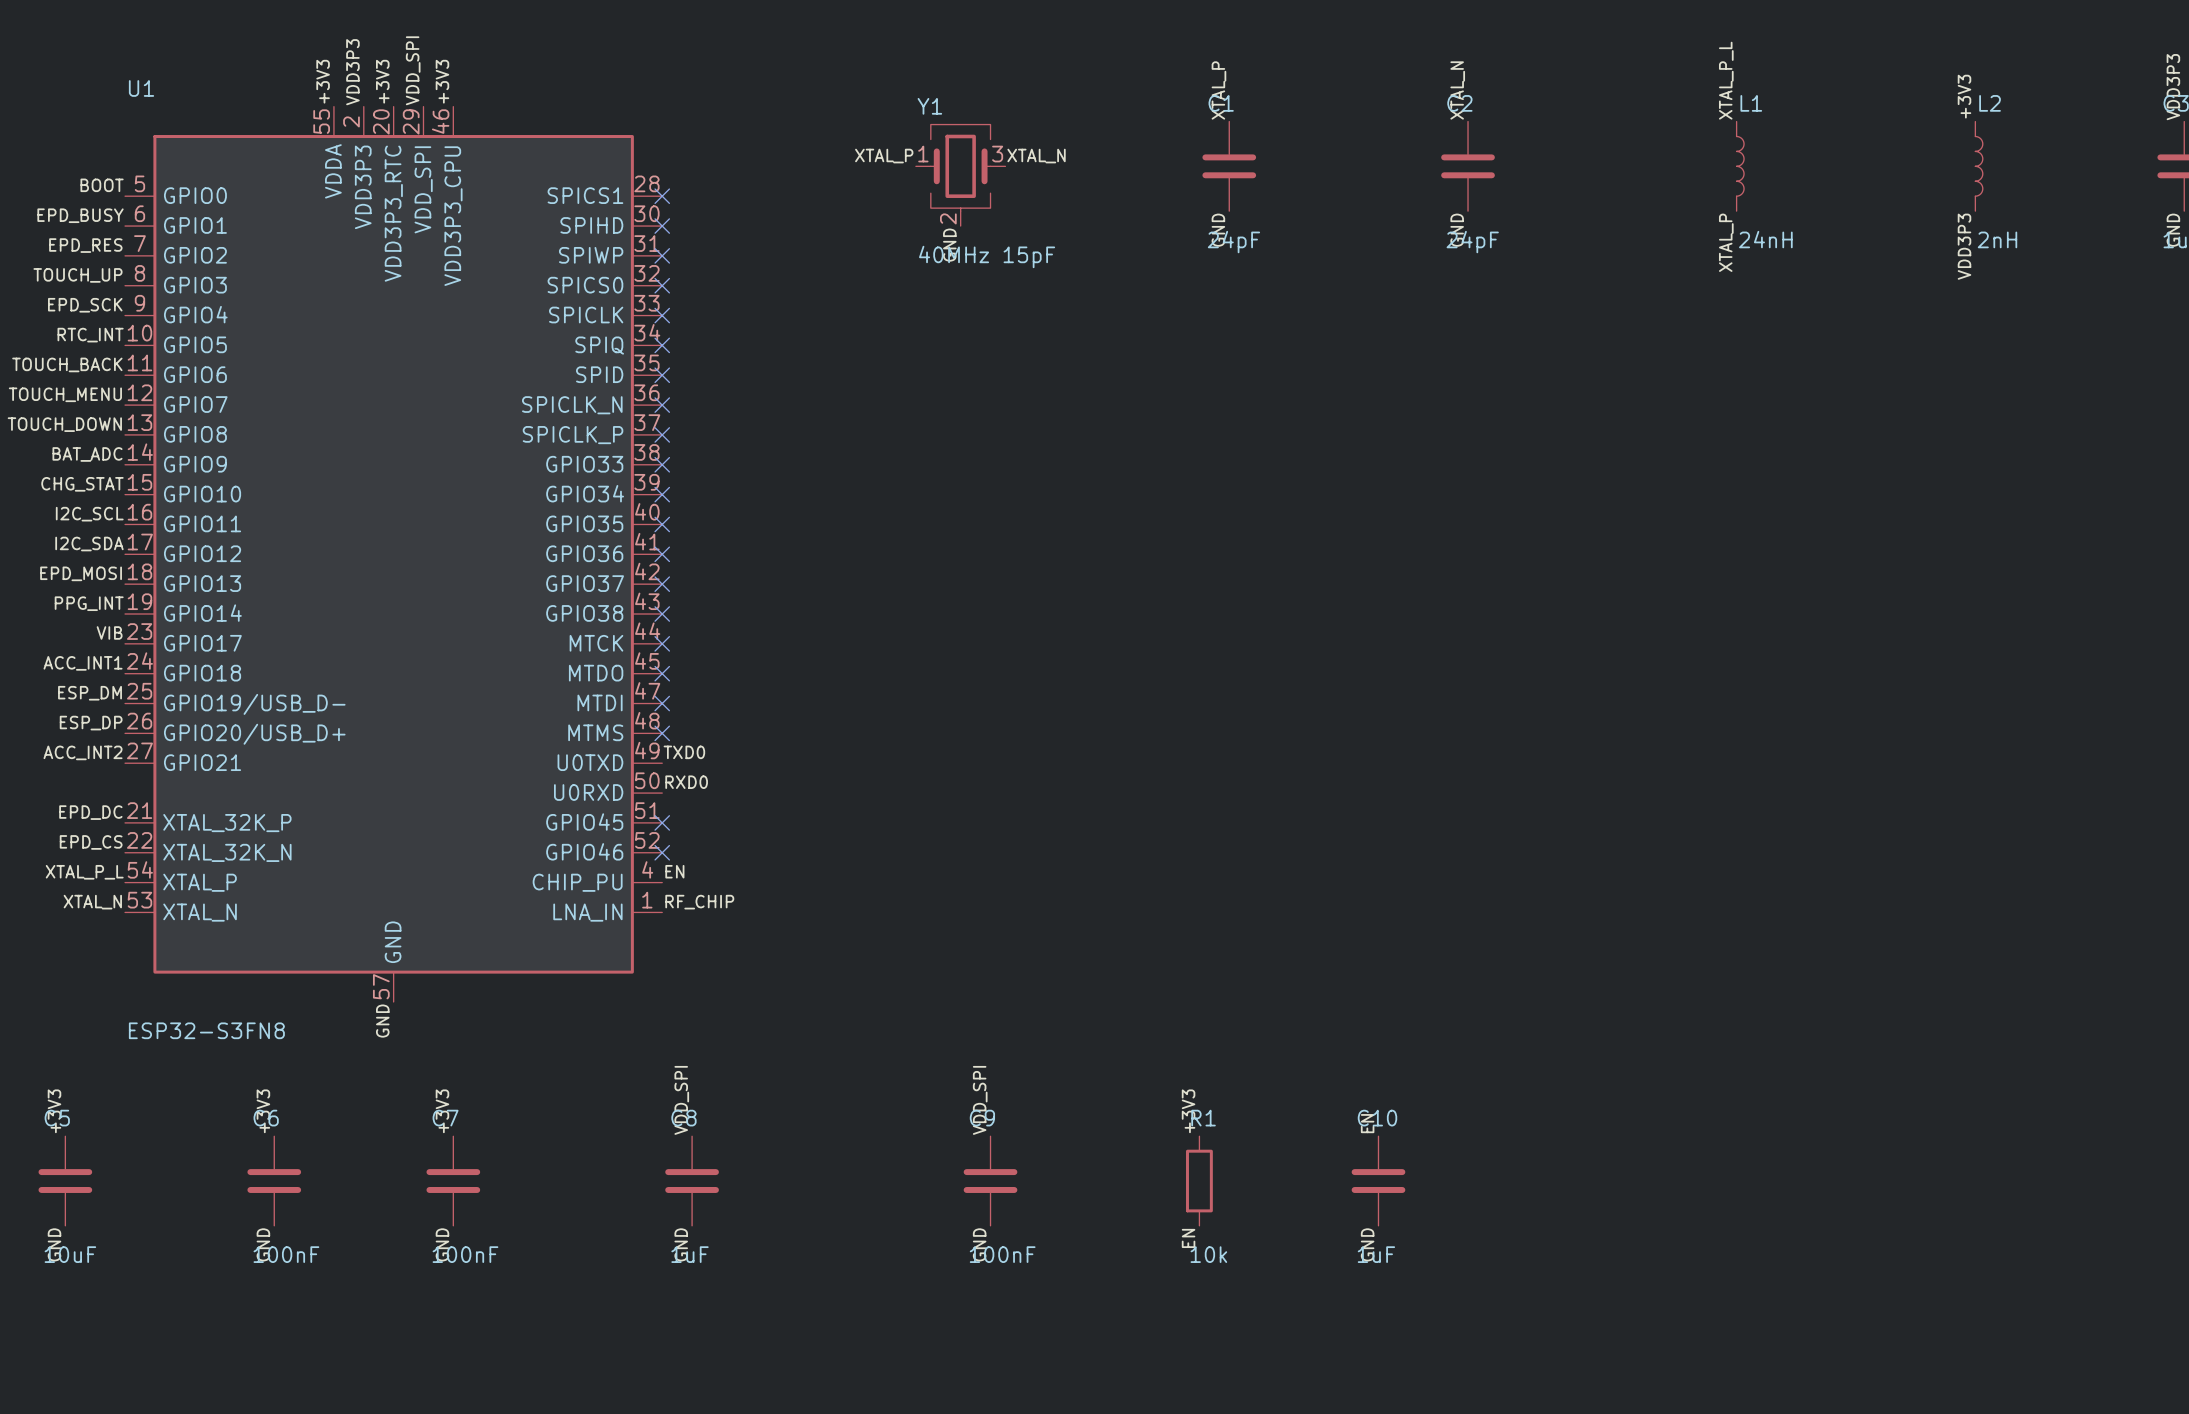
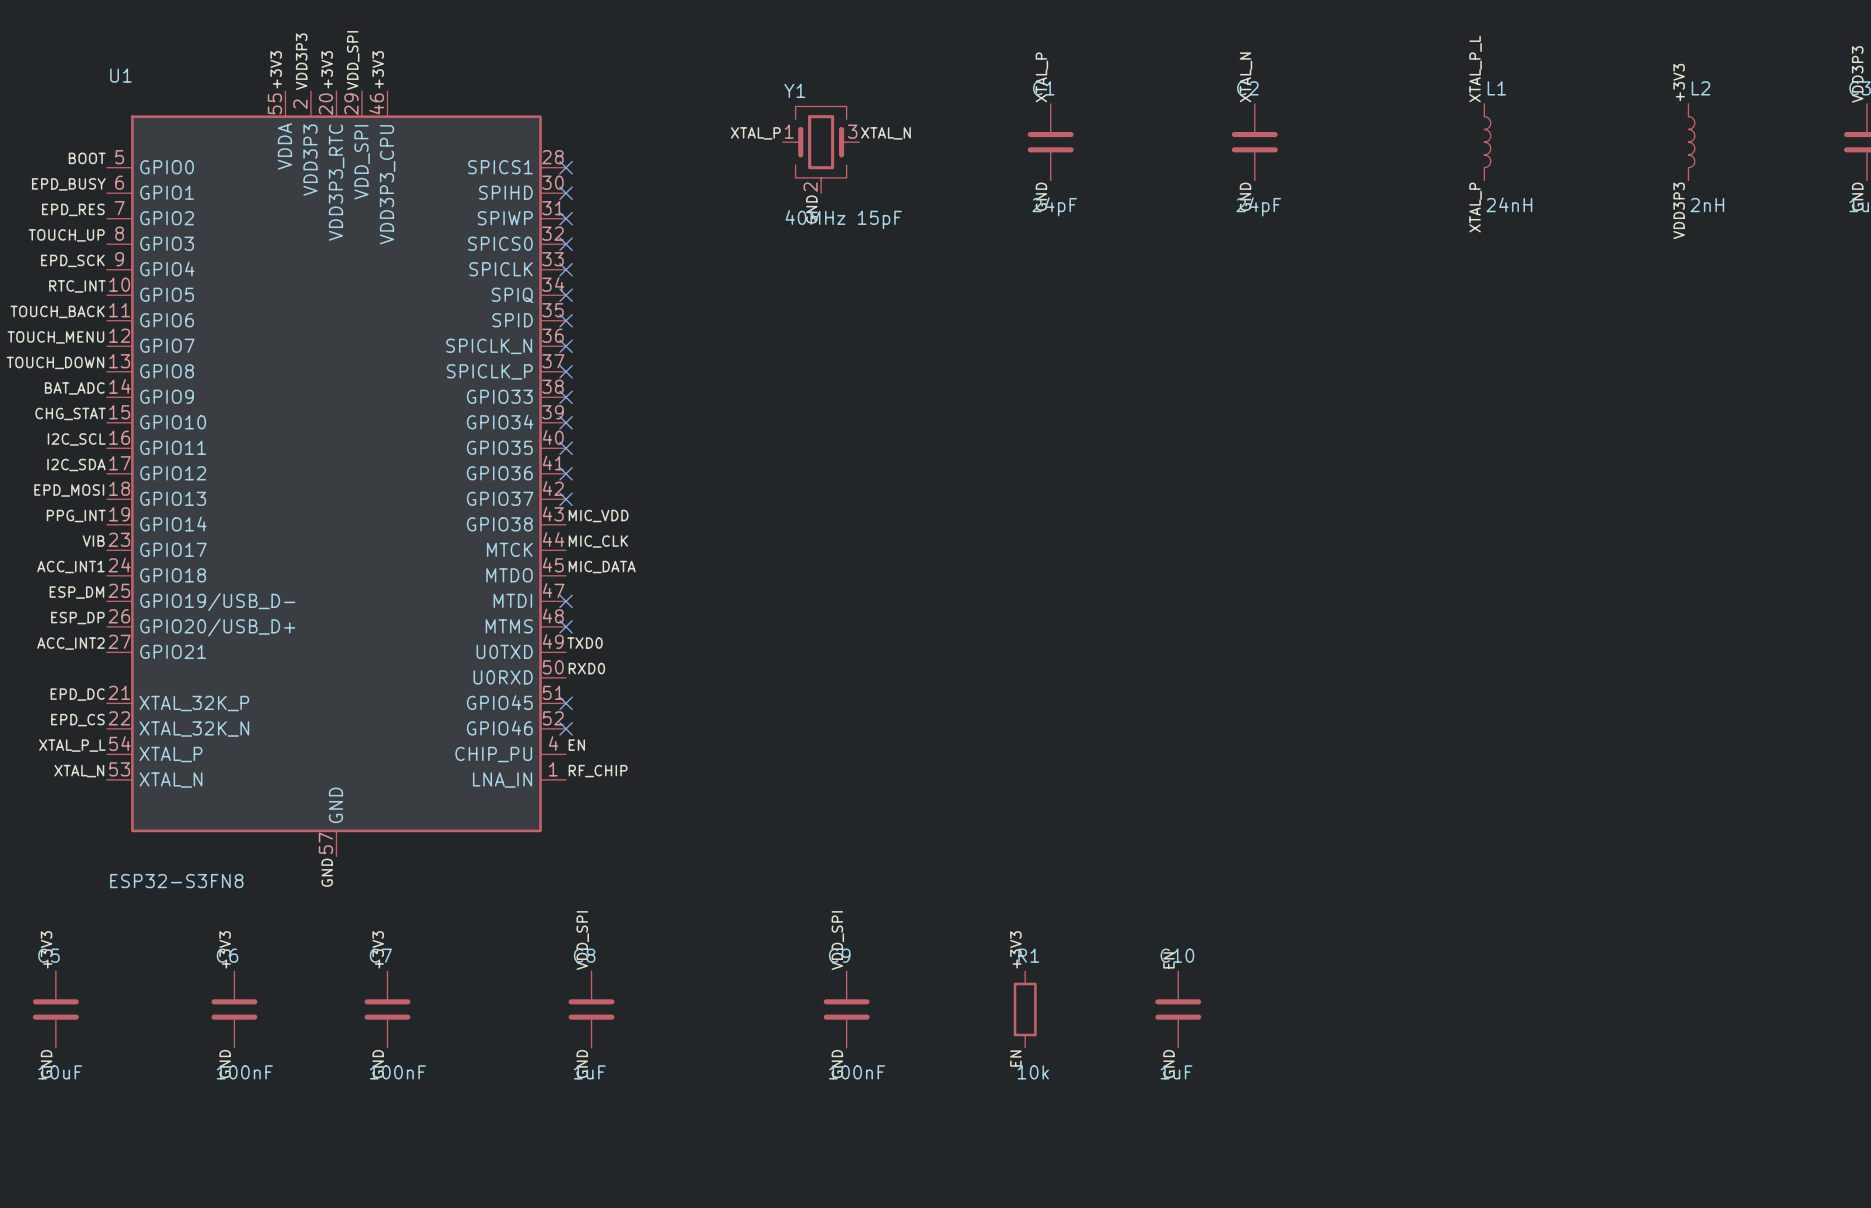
label: none -> MIC_VDD (598, 516)
no-connect mark: (662, 614) -> none
label: none -> MIC_CLK (598, 541)
no-connect mark: (662, 643) -> none
label: none -> MIC_DATA (602, 567)
no-connect mark: (662, 673) -> none

